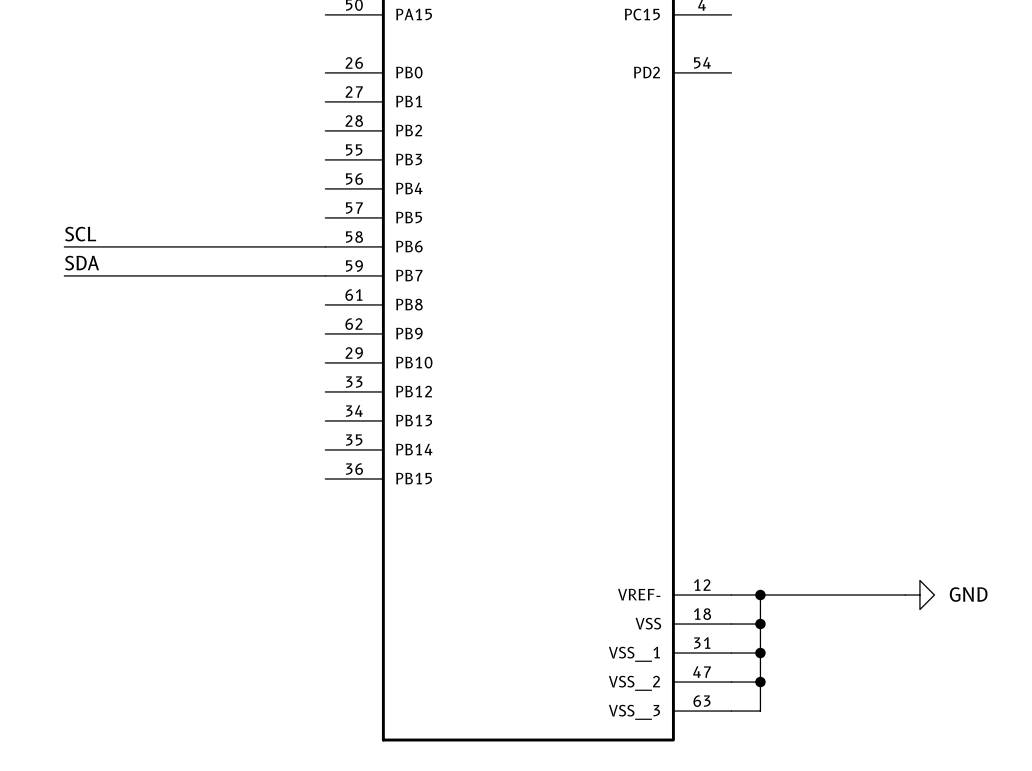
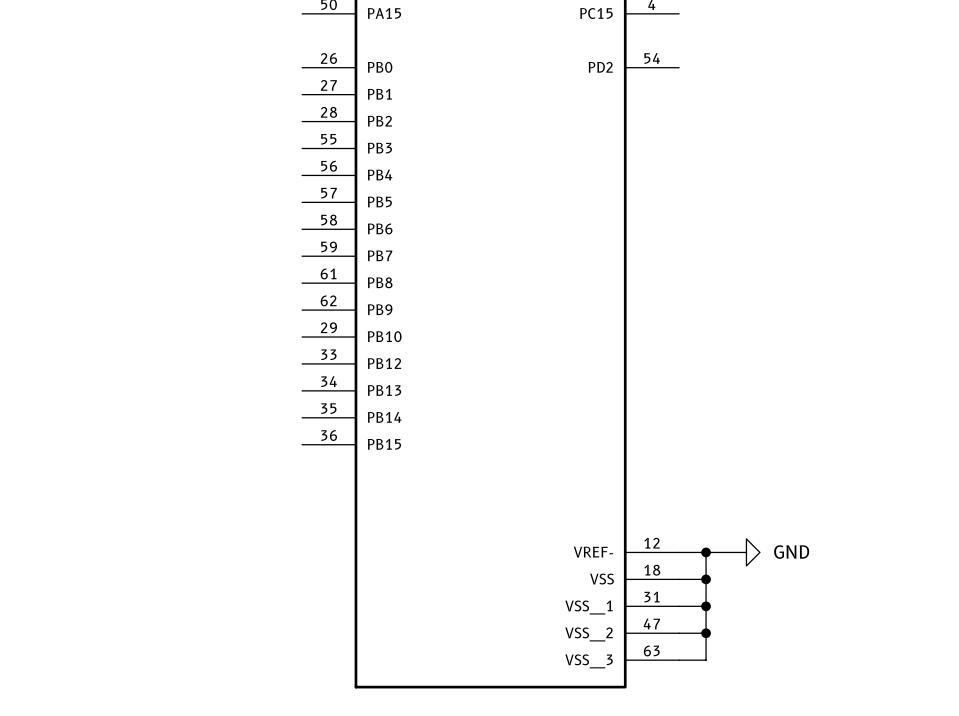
label: SCL (80, 234) -> none
wire: (64, 246) (325, 246) -> none
label: SDA (82, 263) -> none
wire: (64, 275) (325, 275) -> none
wire: (789, 595) (905, 595) -> none
power symbol position: GND (919, 595) -> GND (746, 552)

